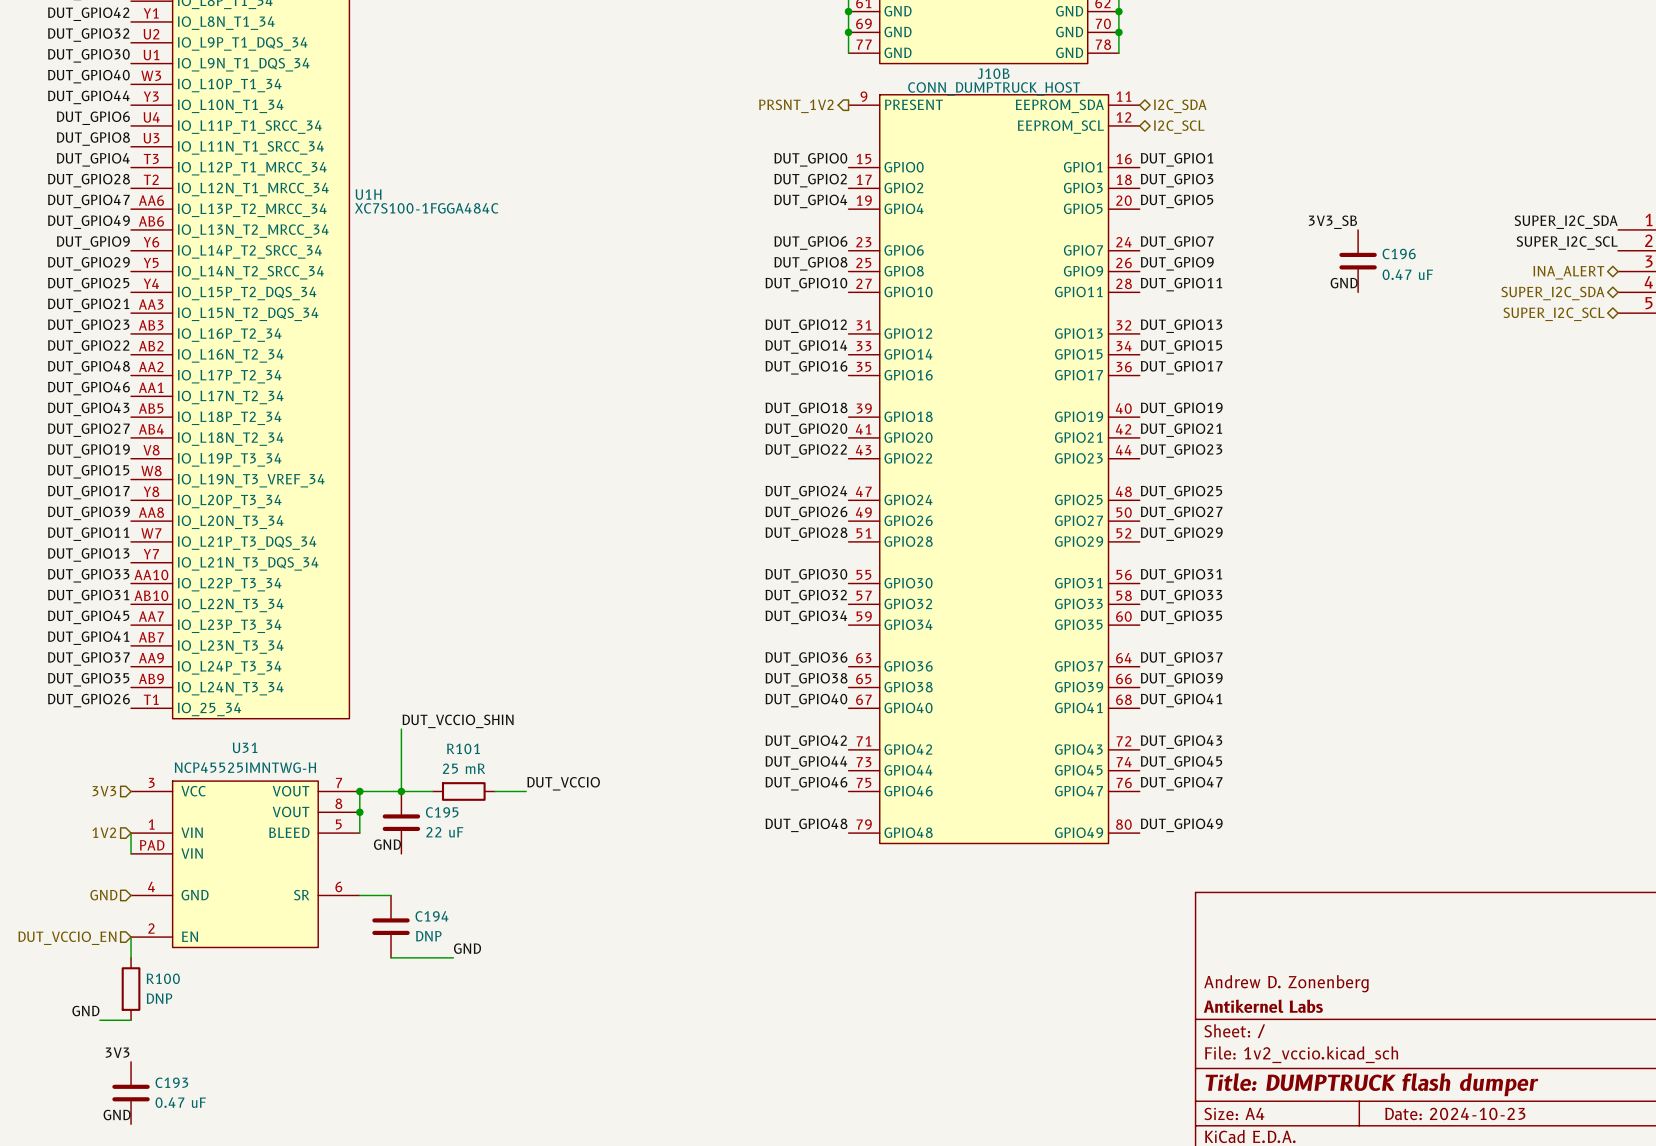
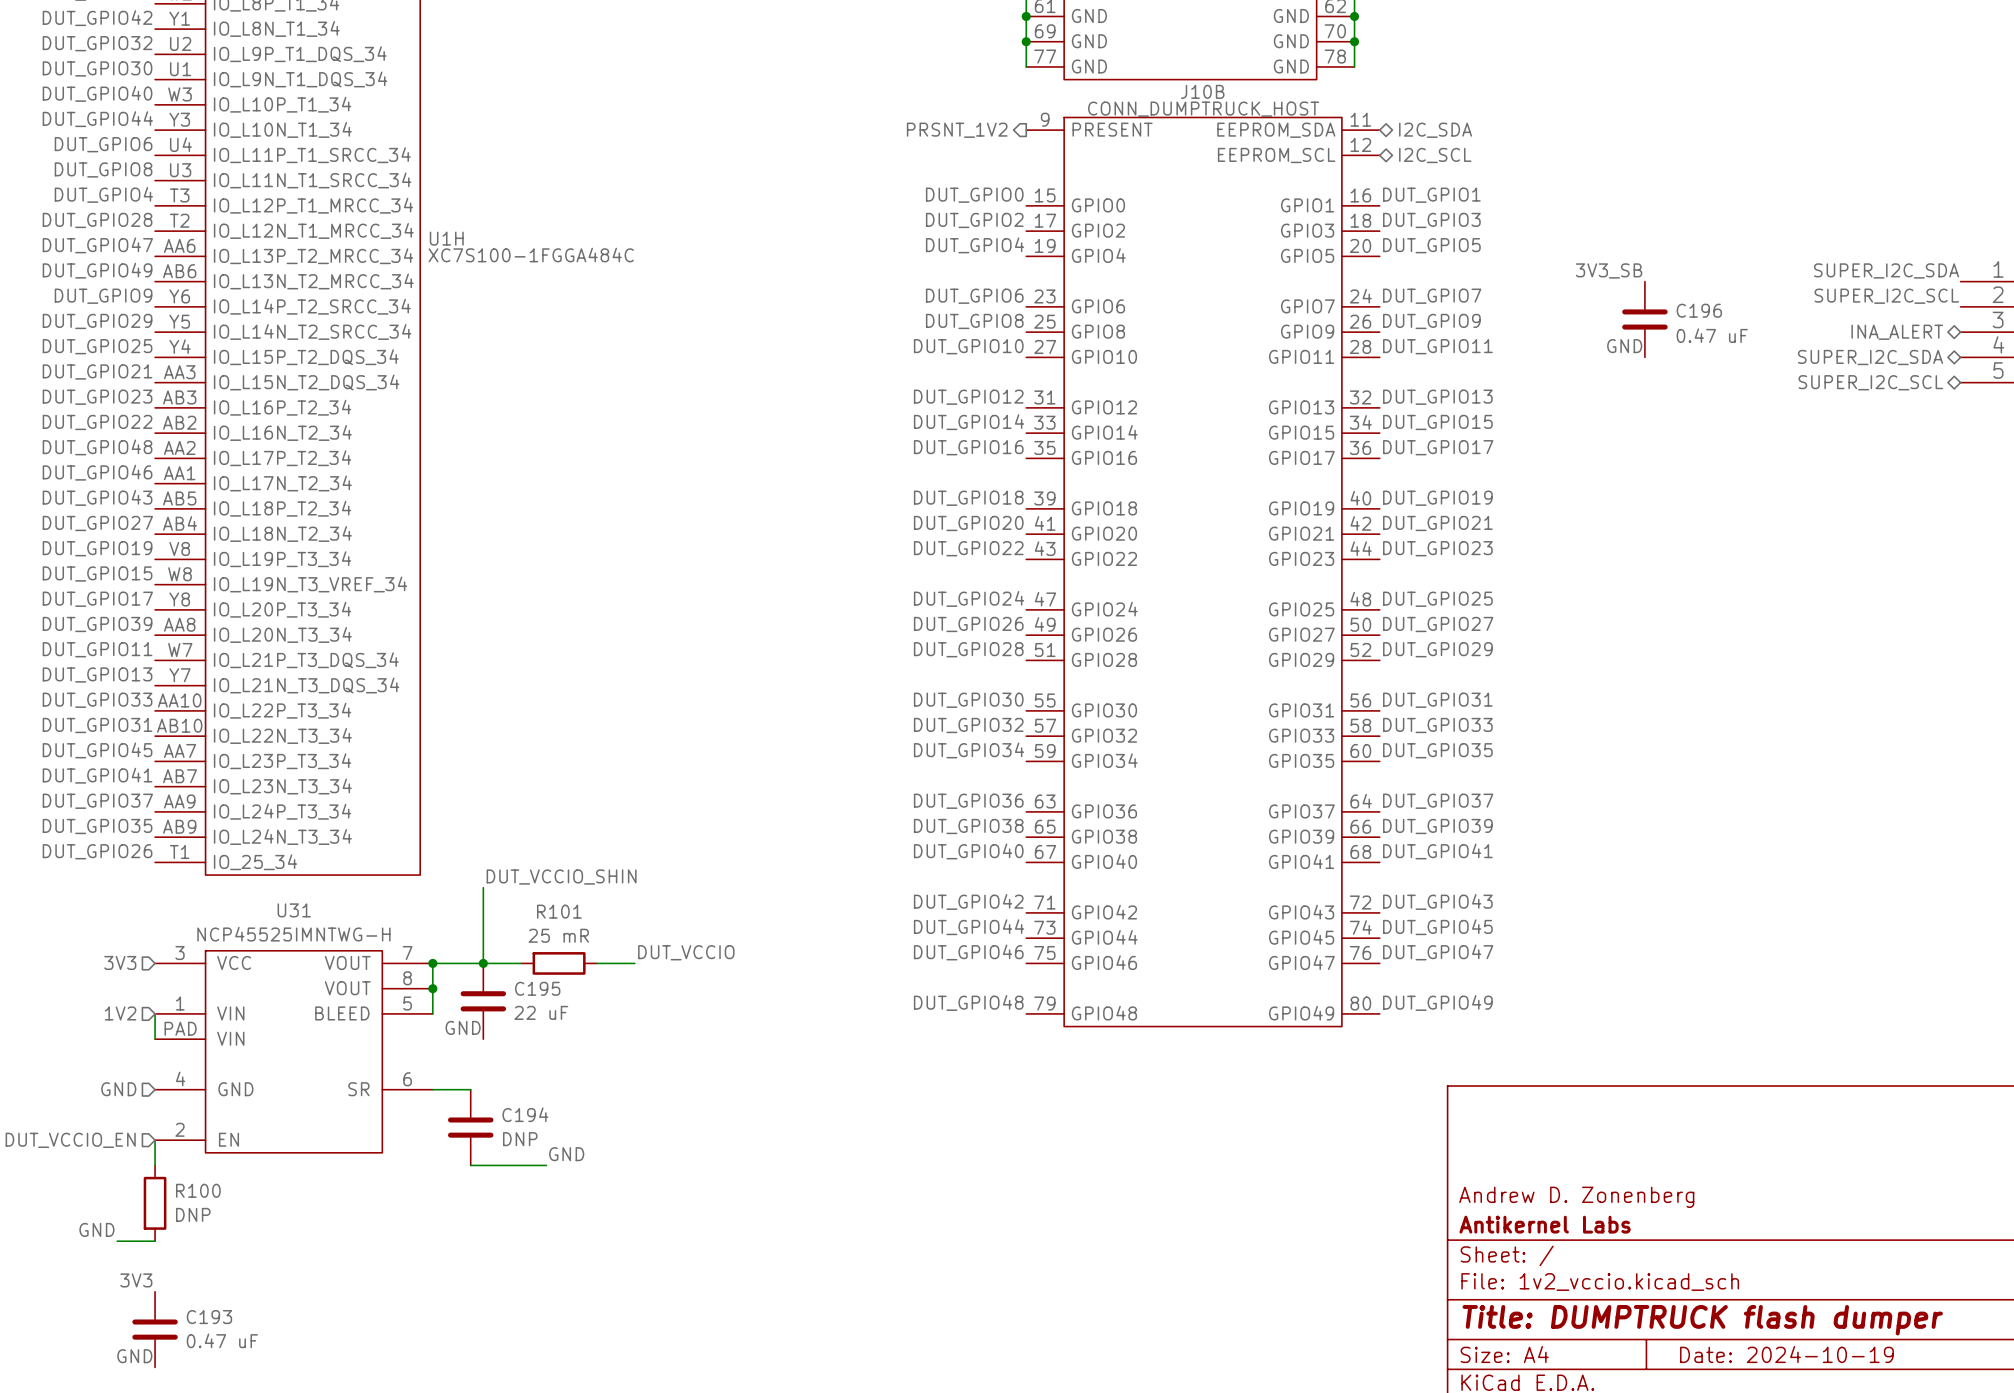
title block: Date: 2024-10-23 (1455, 1113) -> Date: 2024-10-19 (1786, 1354)

